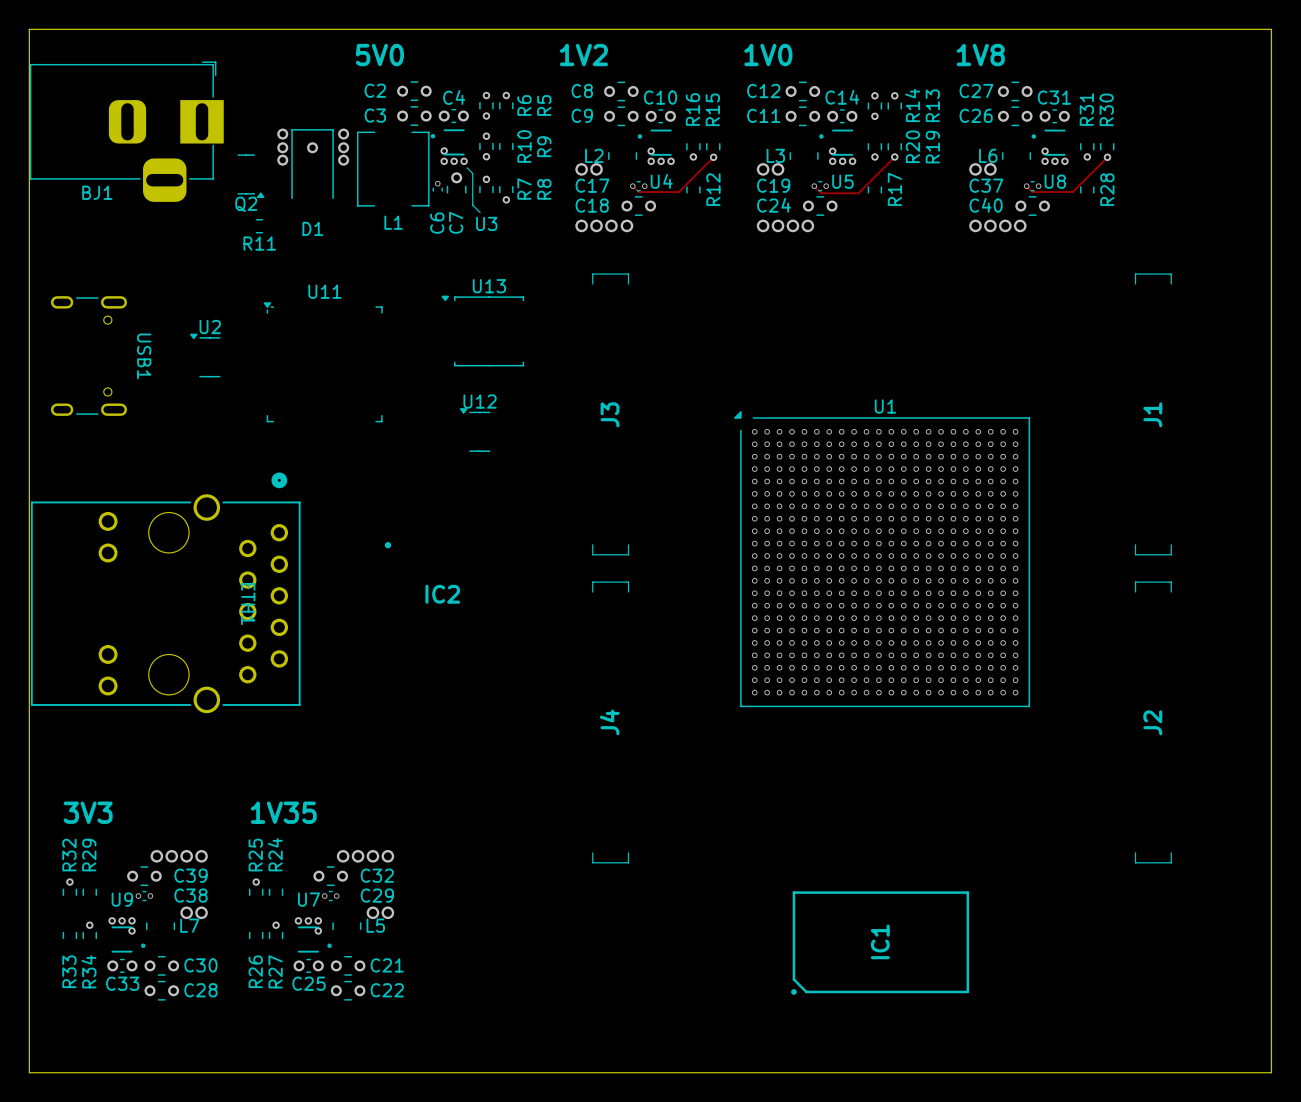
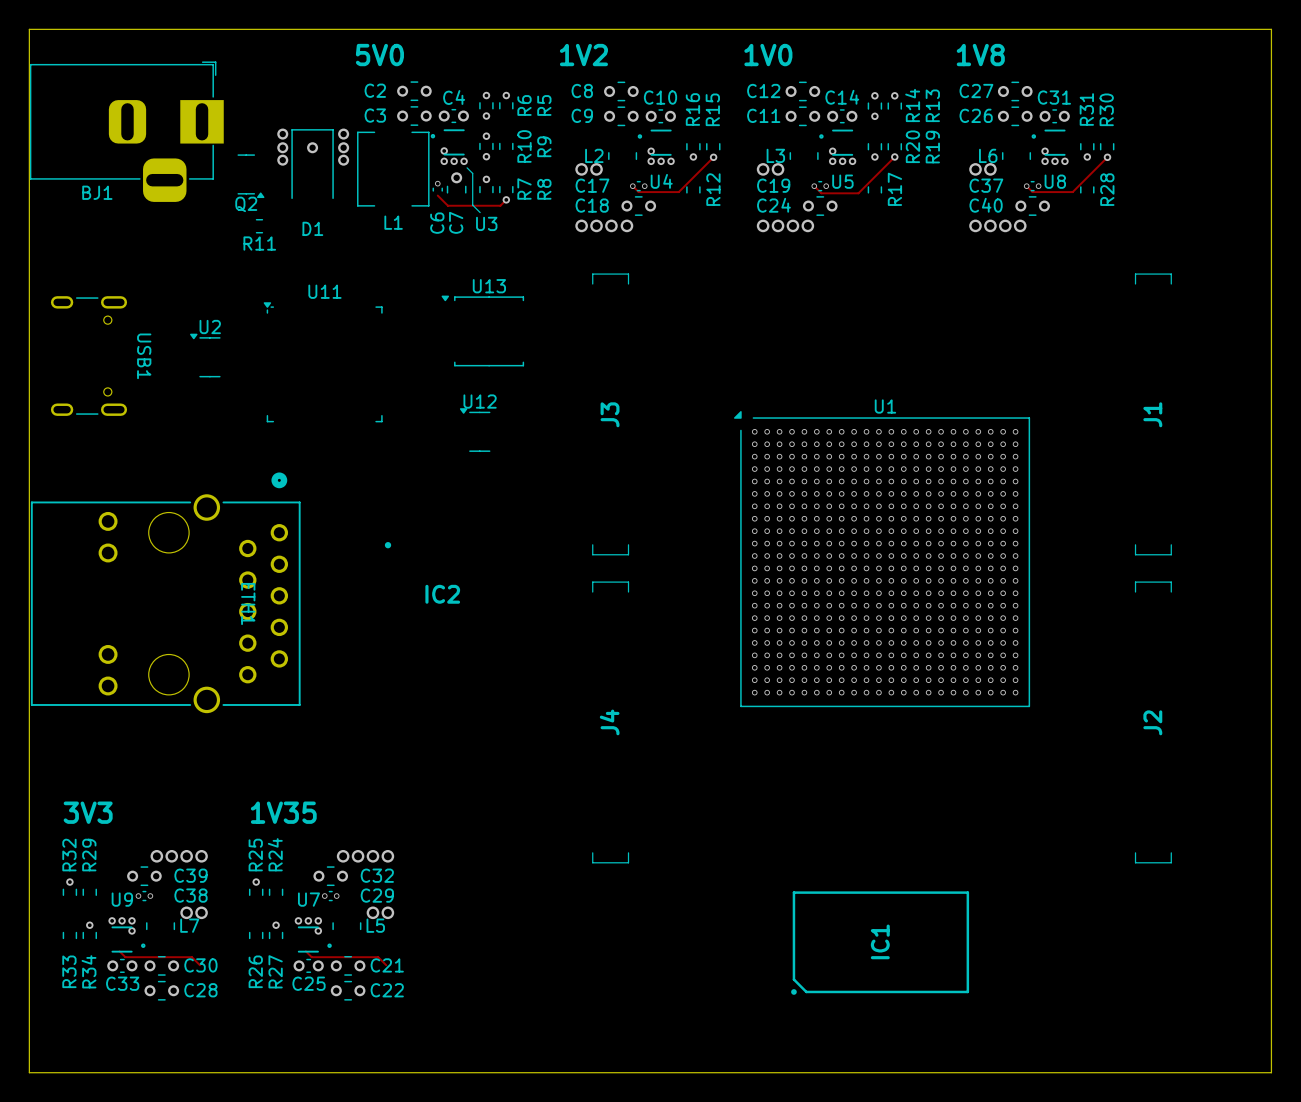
track: none -> (437, 195) (447, 205) (500, 205) (506, 199)
track: none -> (119, 951) (125, 957) (191, 957) (200, 965)
track: none -> (305, 951) (311, 957) (378, 957) (386, 965)

